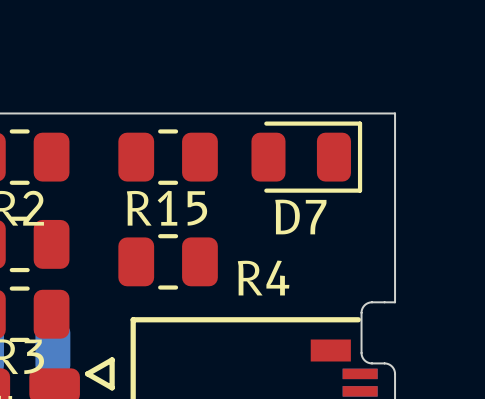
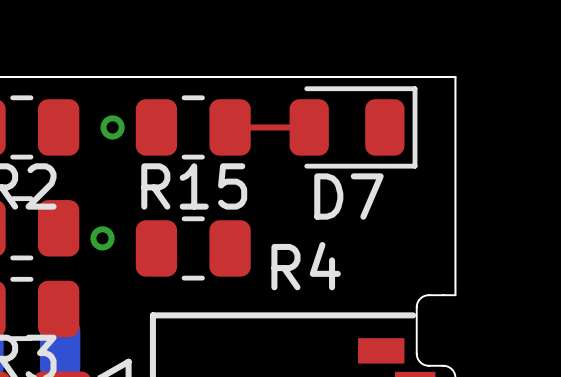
via: none -> (112, 127)
top track: none -> (230, 127) (316, 127)
via: none -> (102, 238)

